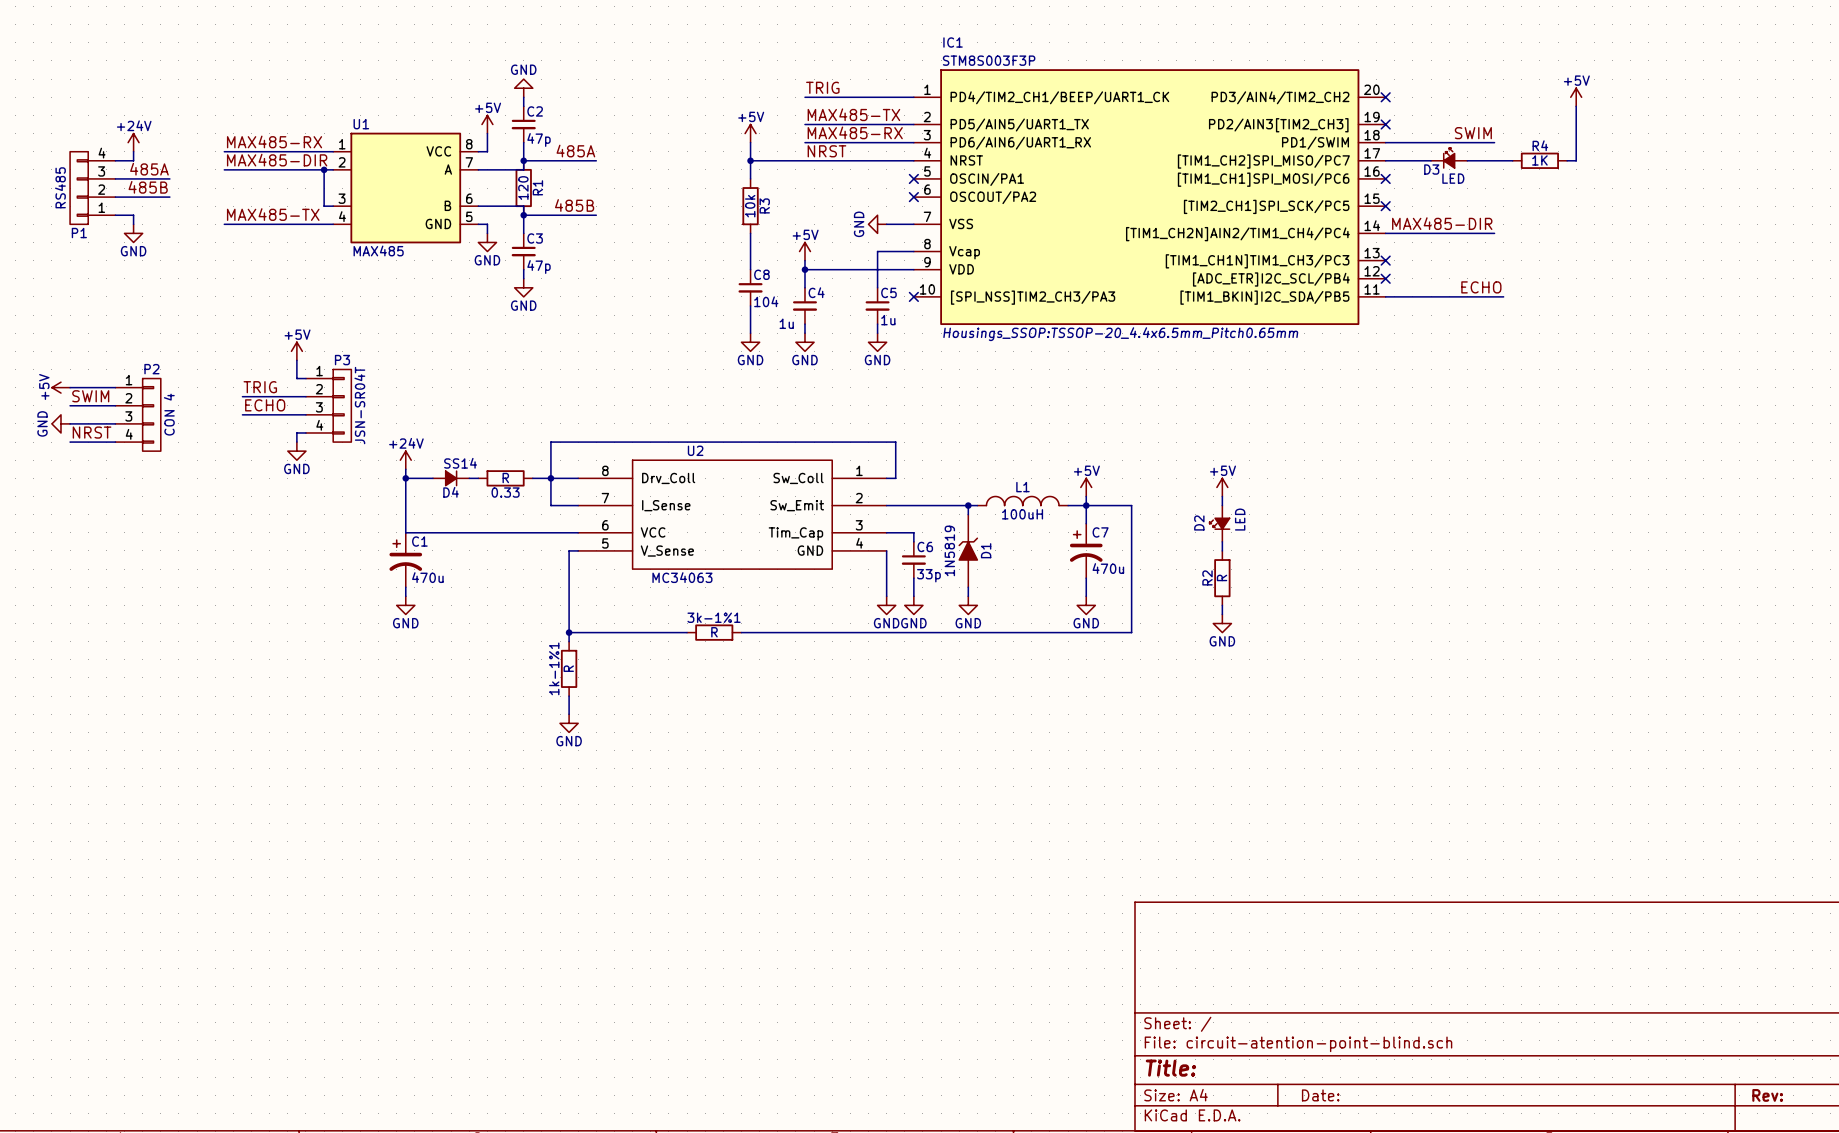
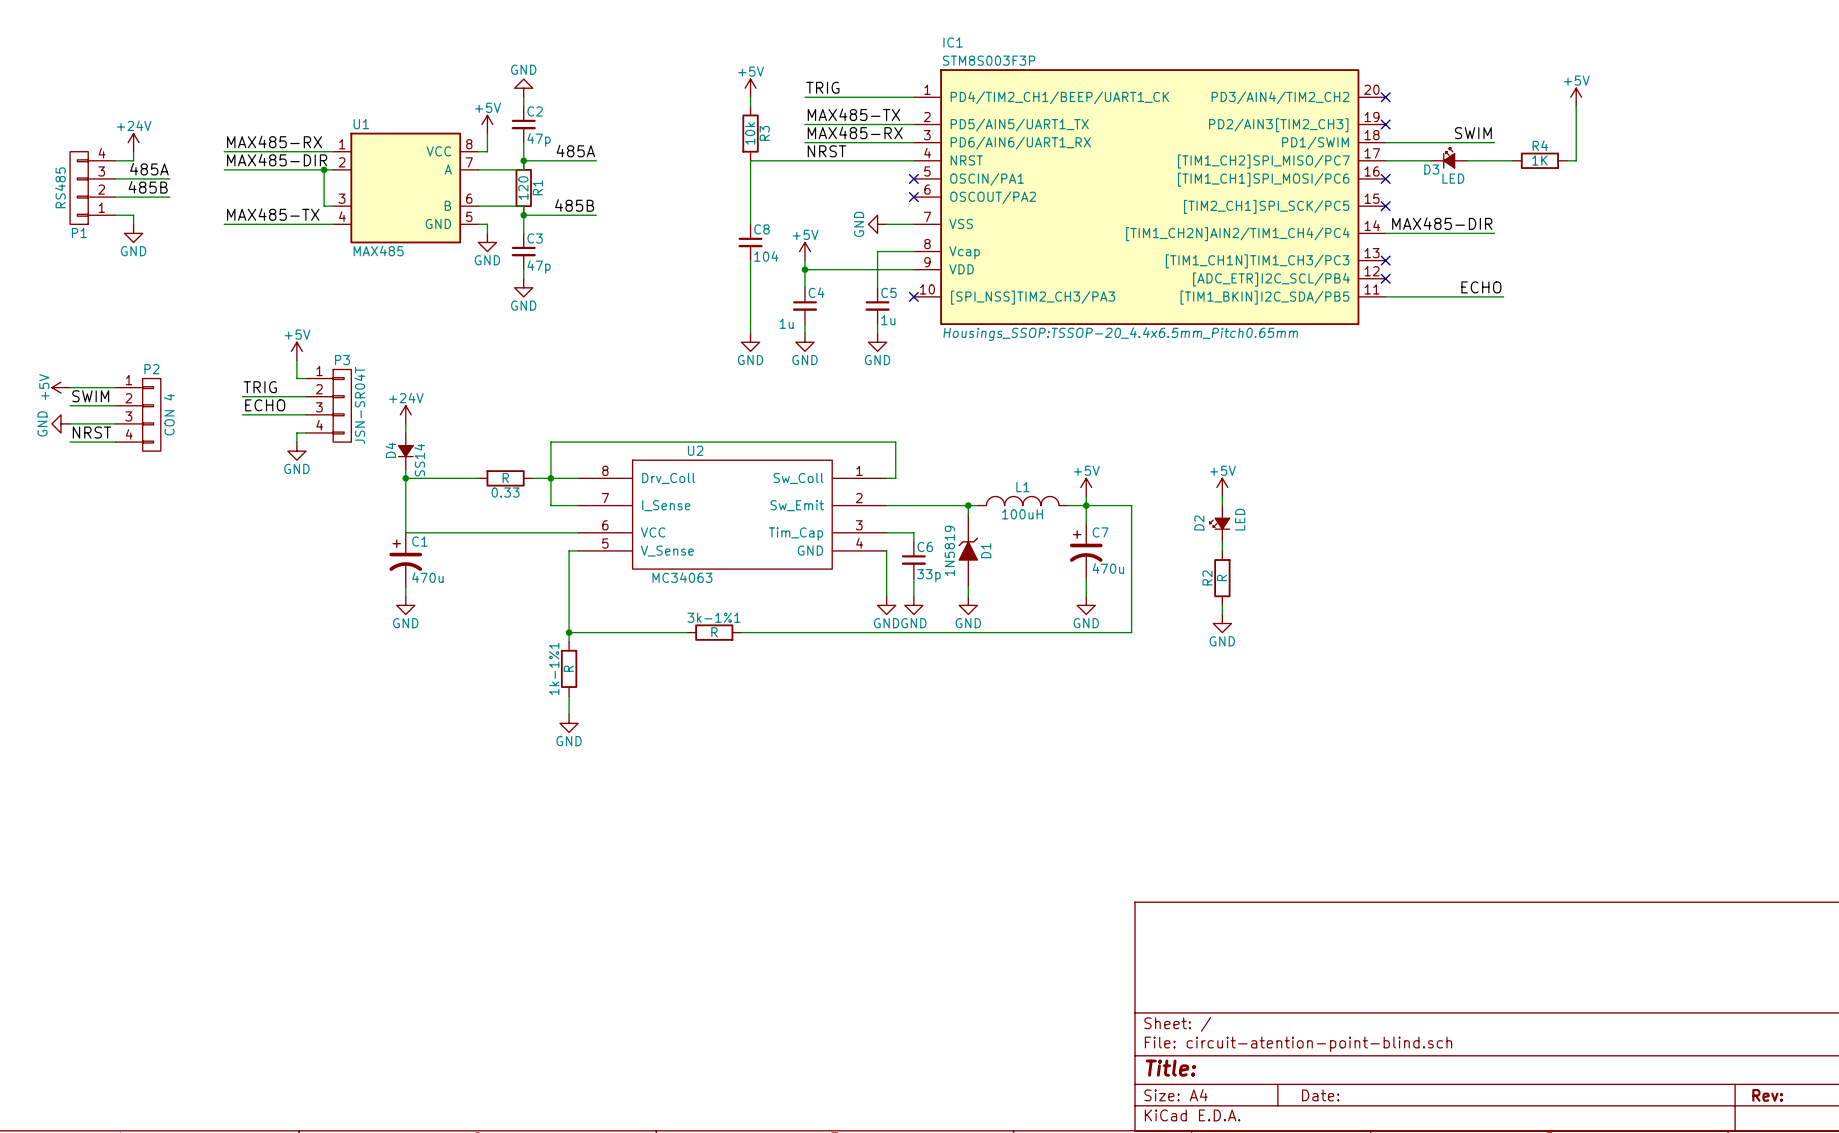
wire: none -> (750, 97) (750, 106)
power symbol position: +5V (750, 133) -> +5V (750, 88)
junction: (750, 160) -> none
wire: none -> (750, 178) (750, 224)
R3 position: (750, 206) -> (750, 133)
C8 position: (750, 287) -> (750, 242)
wire: none -> (405, 423) (405, 432)
power symbol position: +24V (405, 460) -> +24V (405, 414)
D4 rotation: 0° (451, 478) -> 90° clockwise (405, 451)
D4 position: (451, 478) -> (405, 451)

